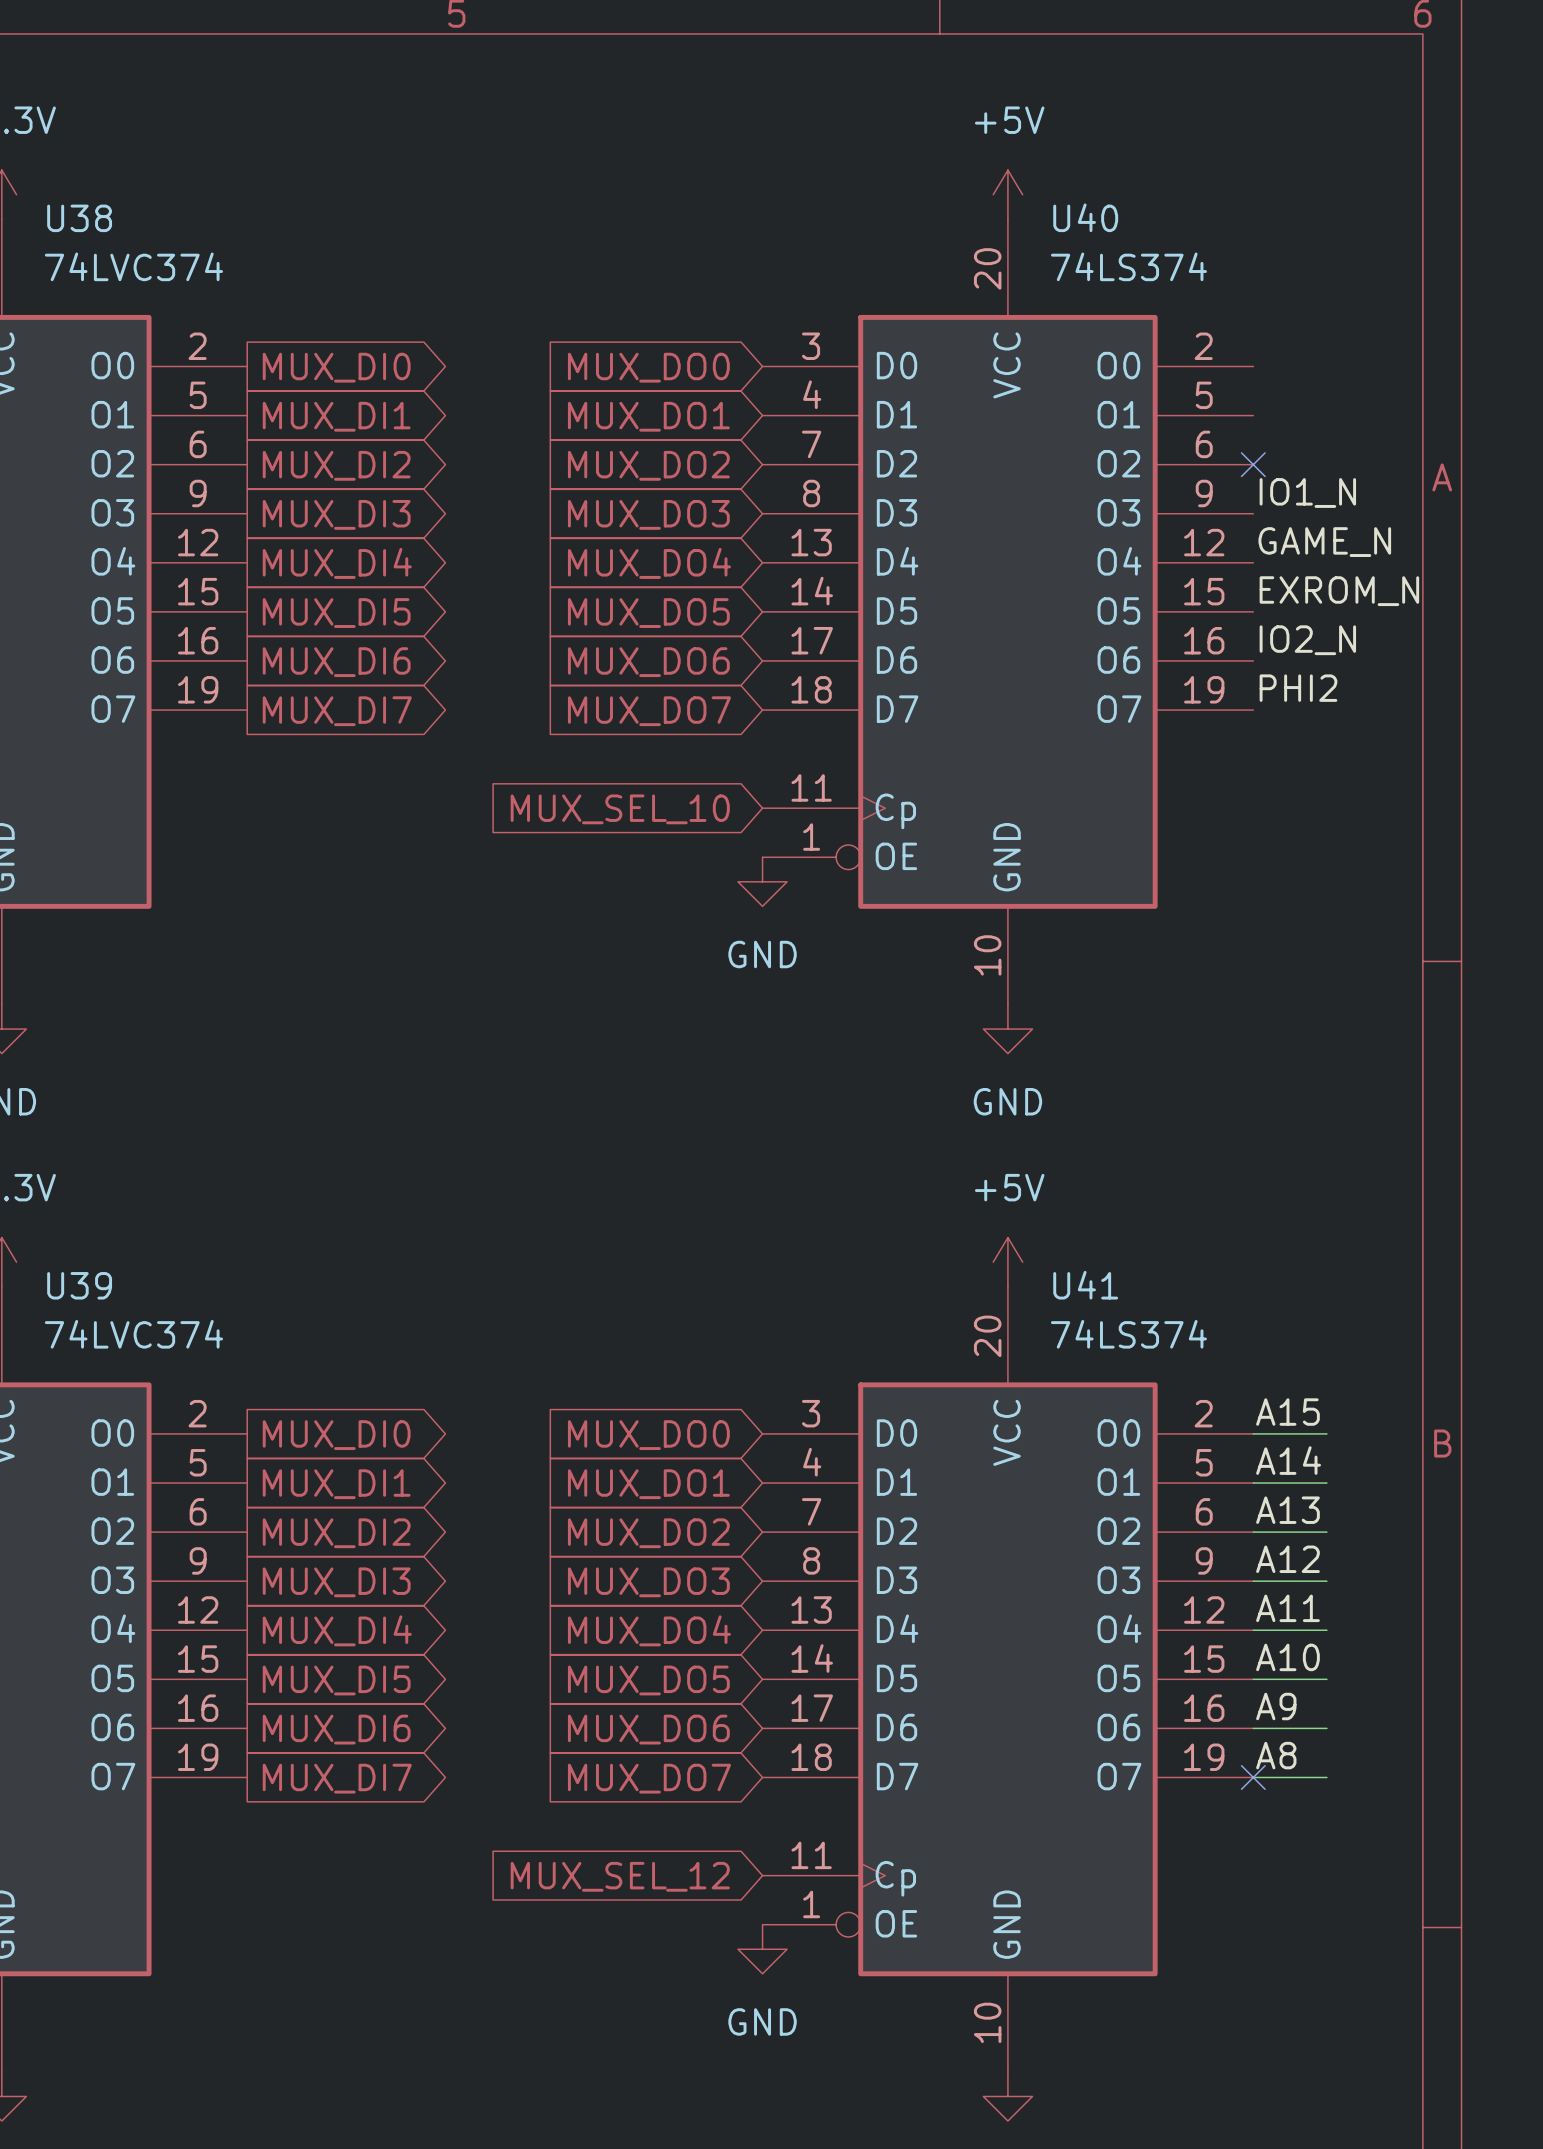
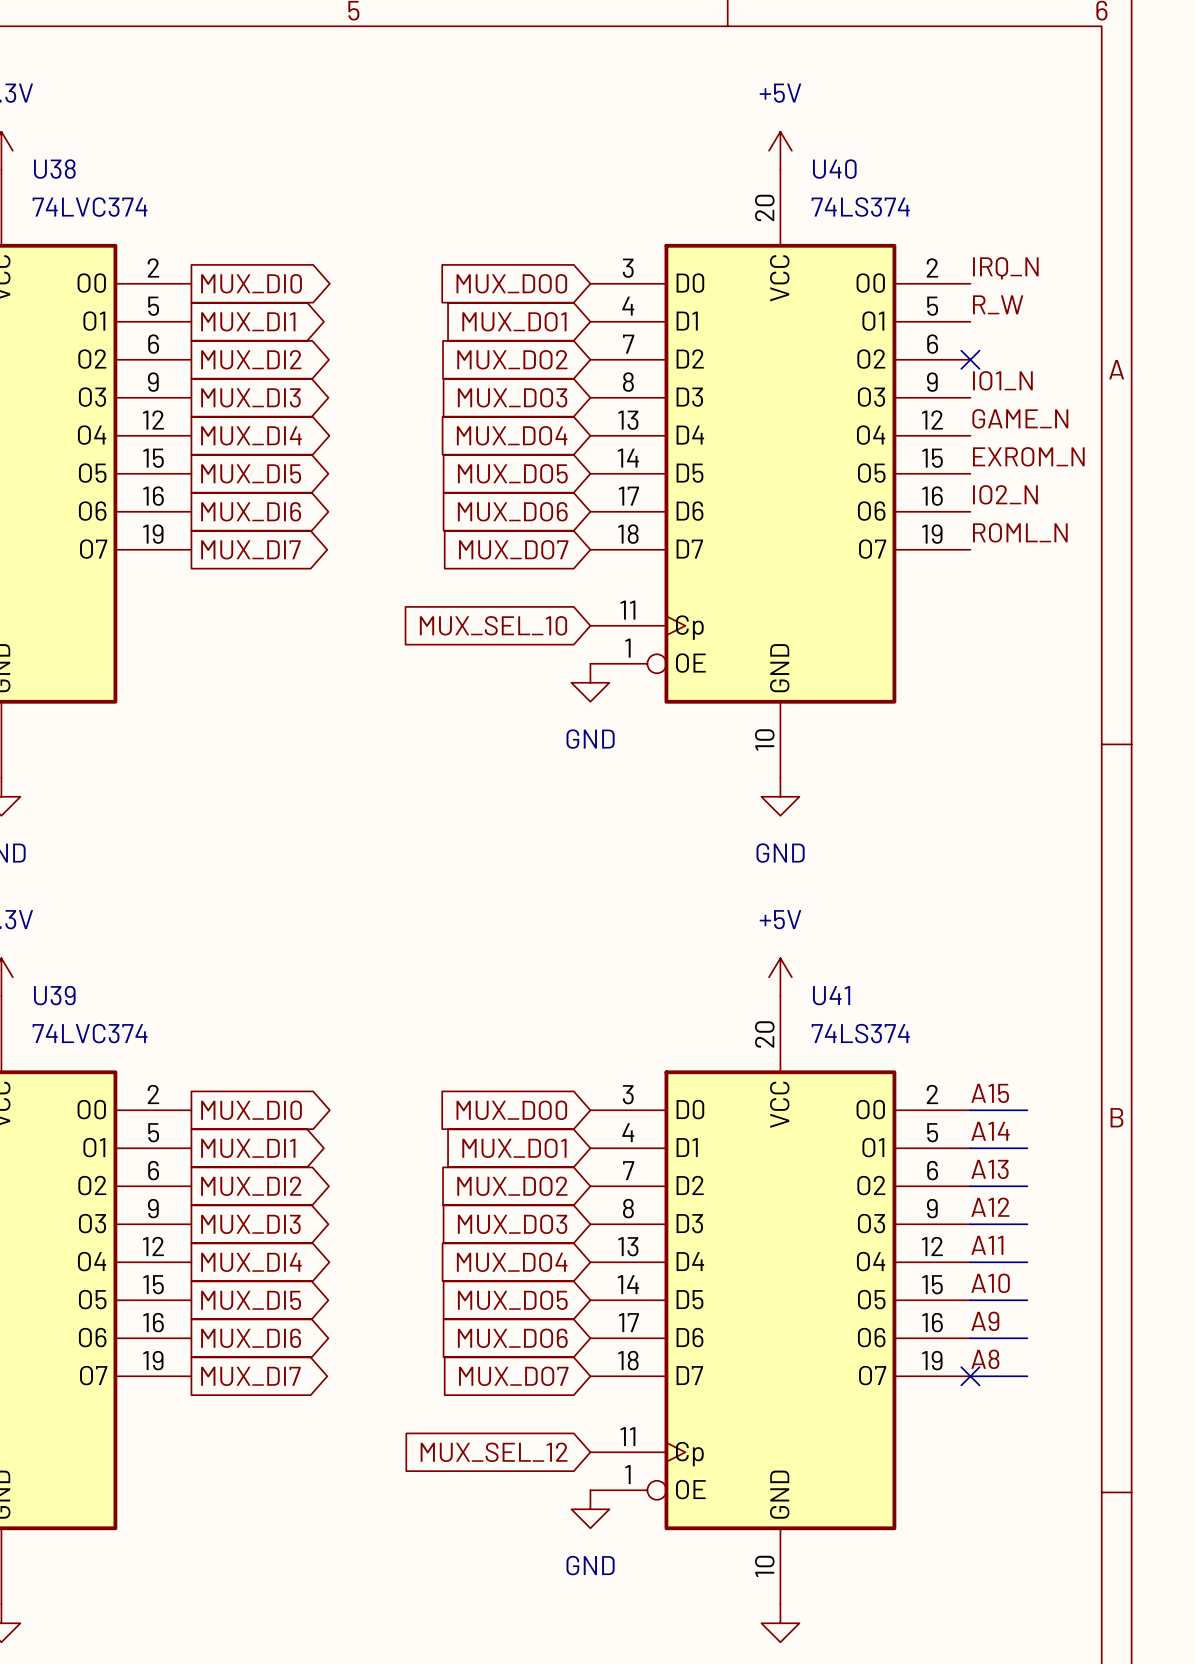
label: none -> IRQ_N (1005, 268)
label: none -> R_W (998, 304)
label: PHI2 (1298, 688) -> ROML_N (1020, 532)

